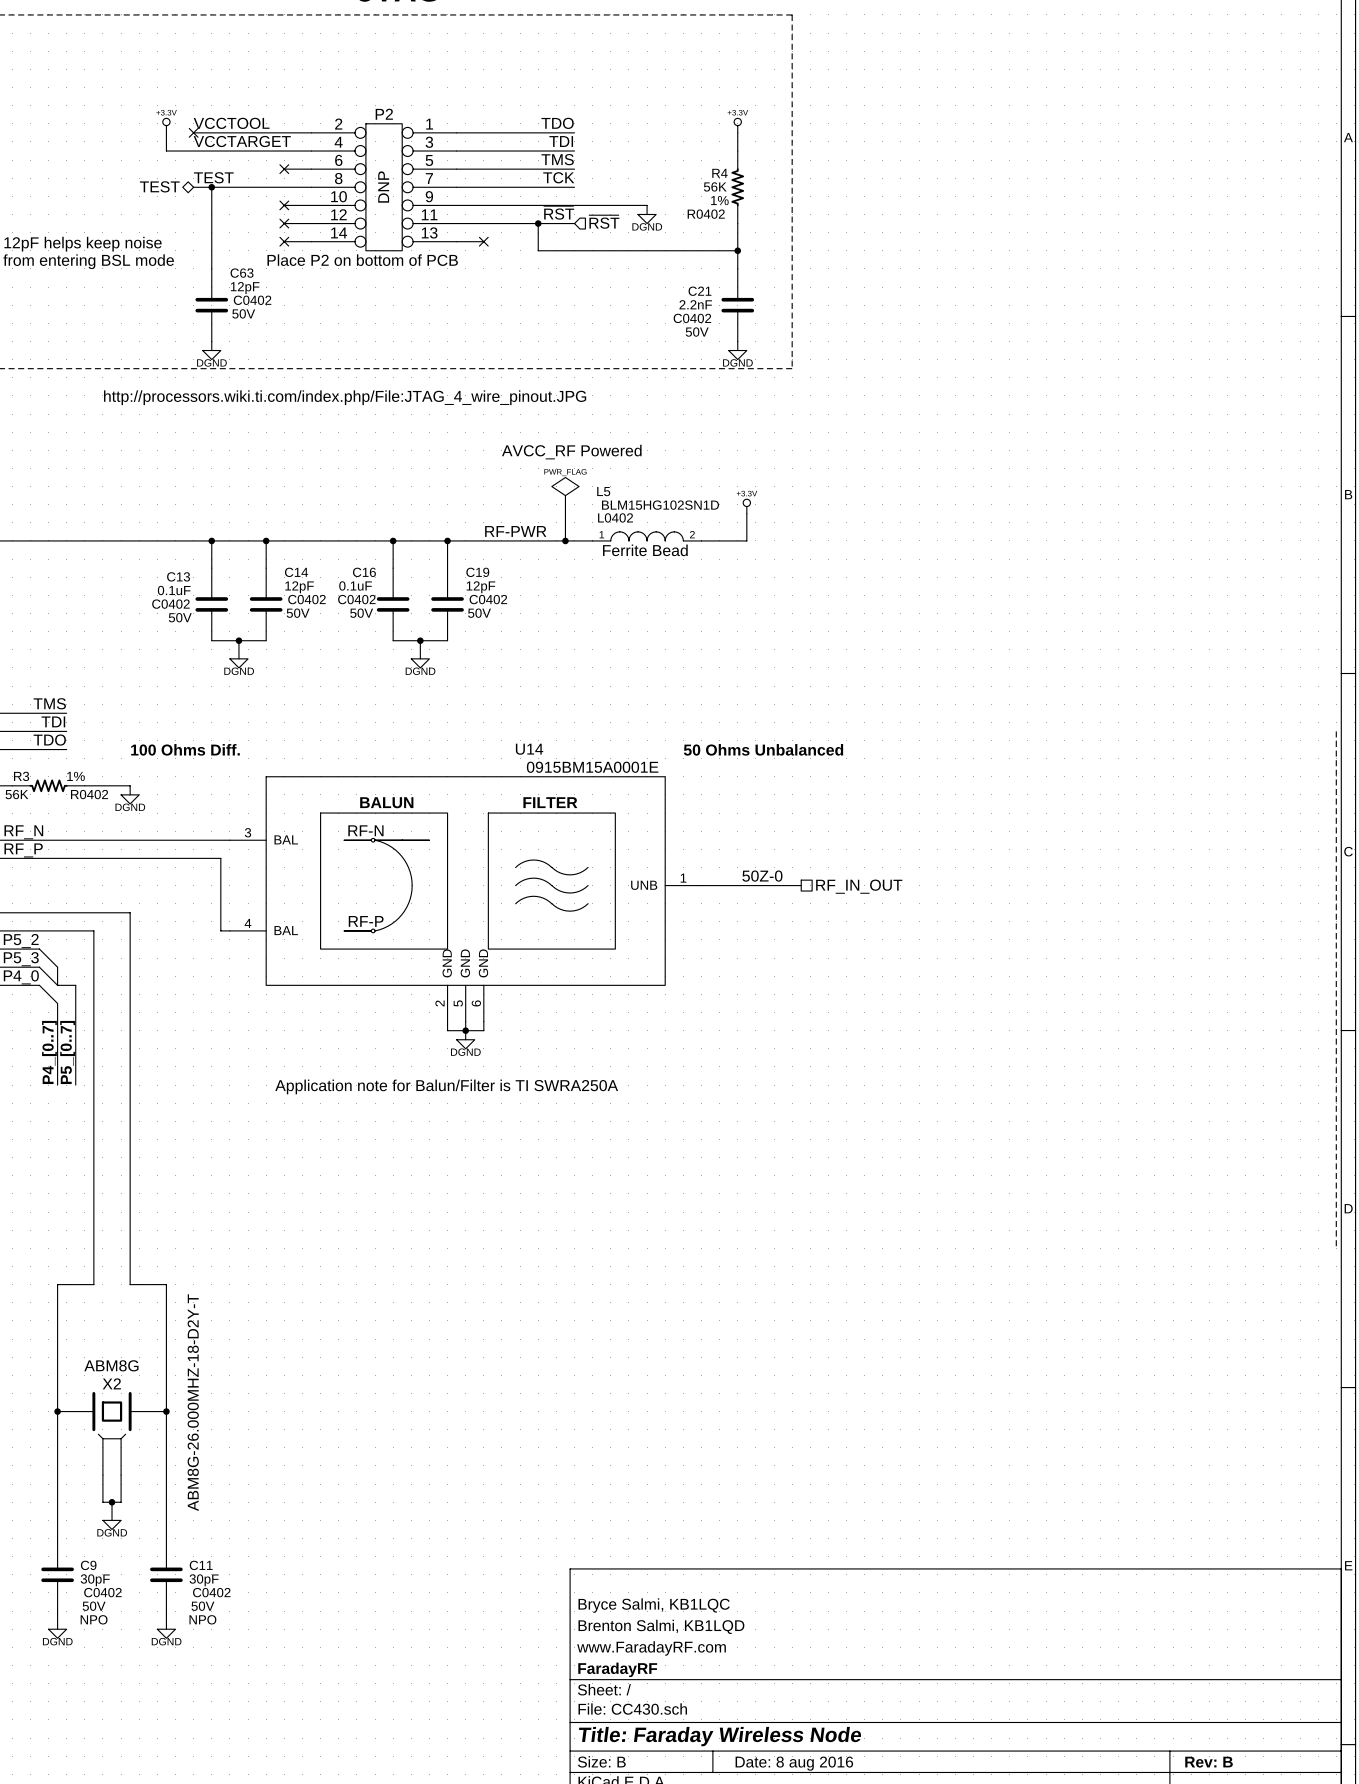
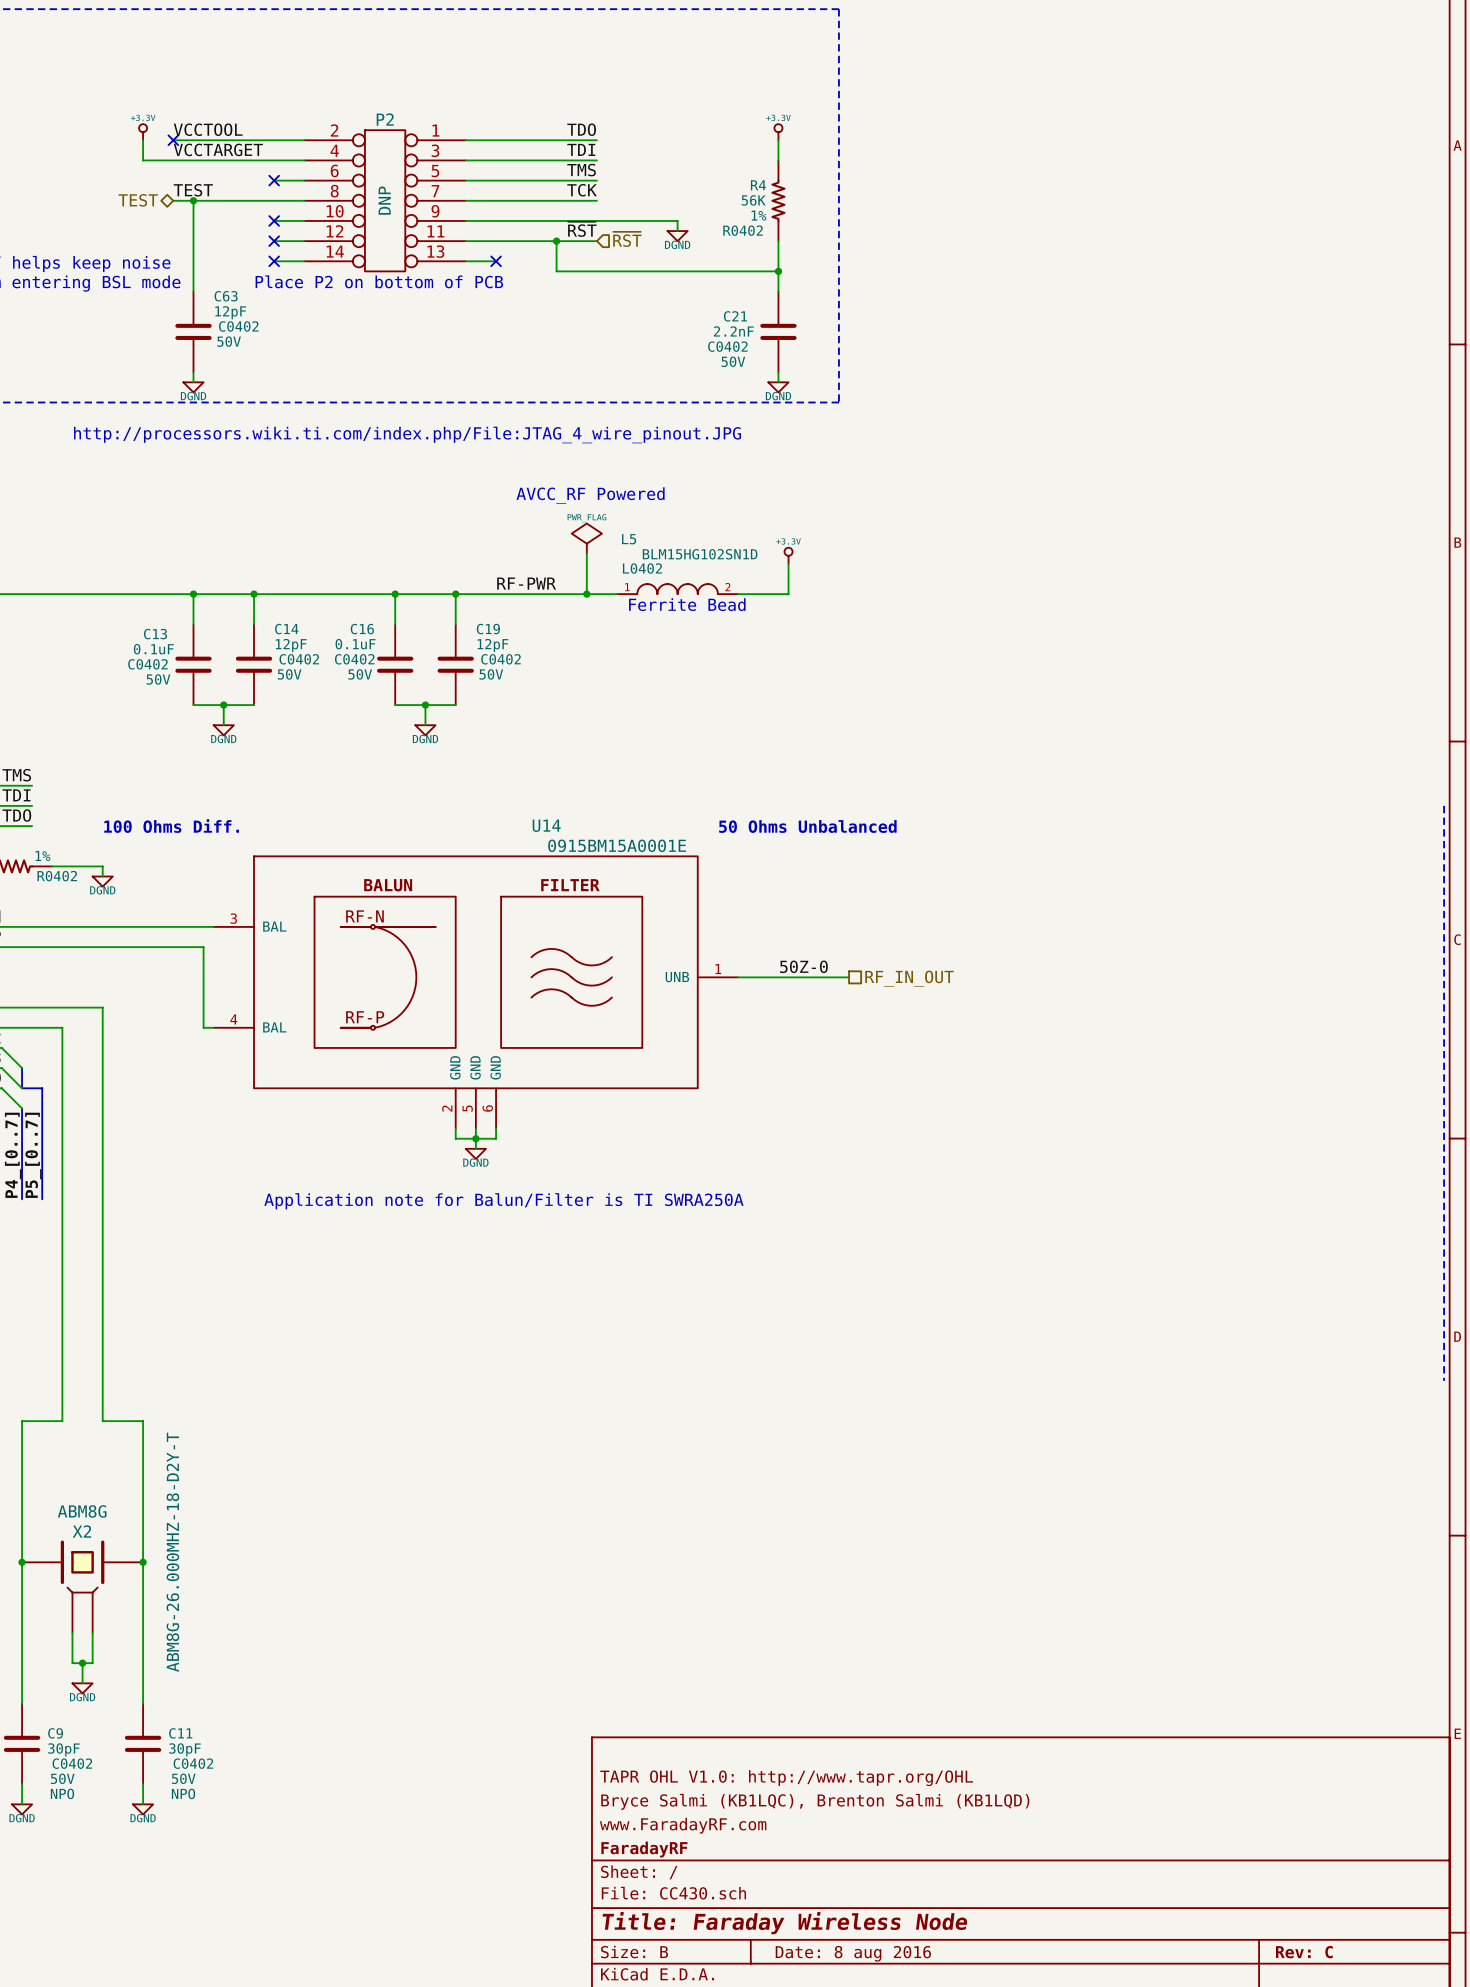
title block: Bryce Salmi, KB1LQC (654, 1605) -> TAPR OHL V1.0: http://www.tapr.org/OHL (786, 1778)
title block: Brenton Salmi, KB1LQD (661, 1626) -> Bryce Salmi (KB1LQC), Brenton Salmi (KB1LQD) (815, 1801)
title block: Rev: B (1209, 1762) -> Rev: C (1304, 1952)

